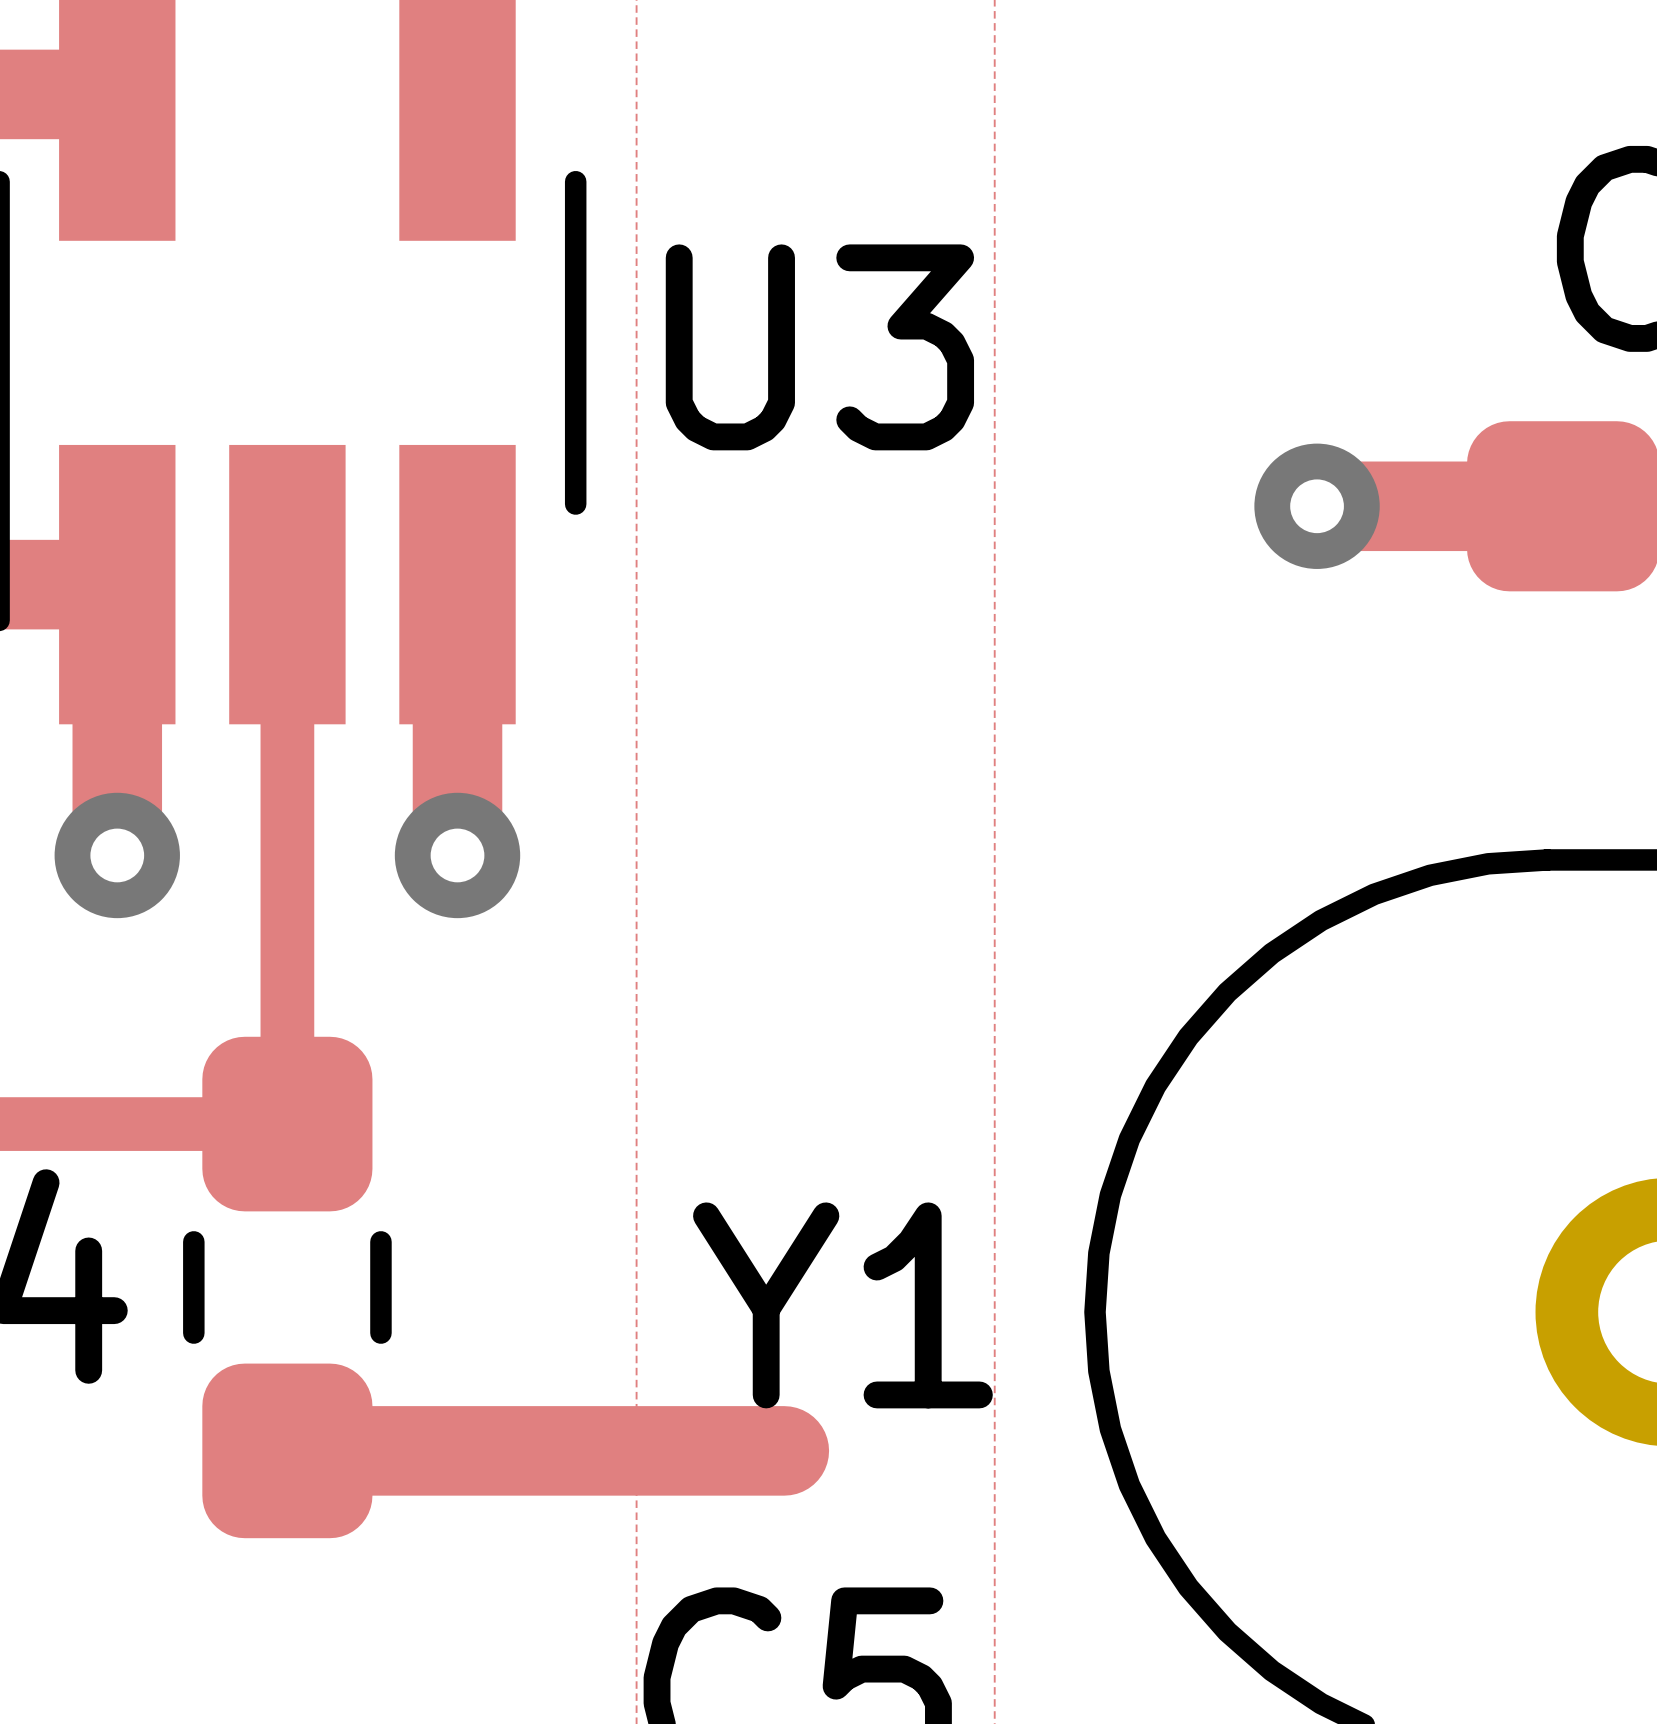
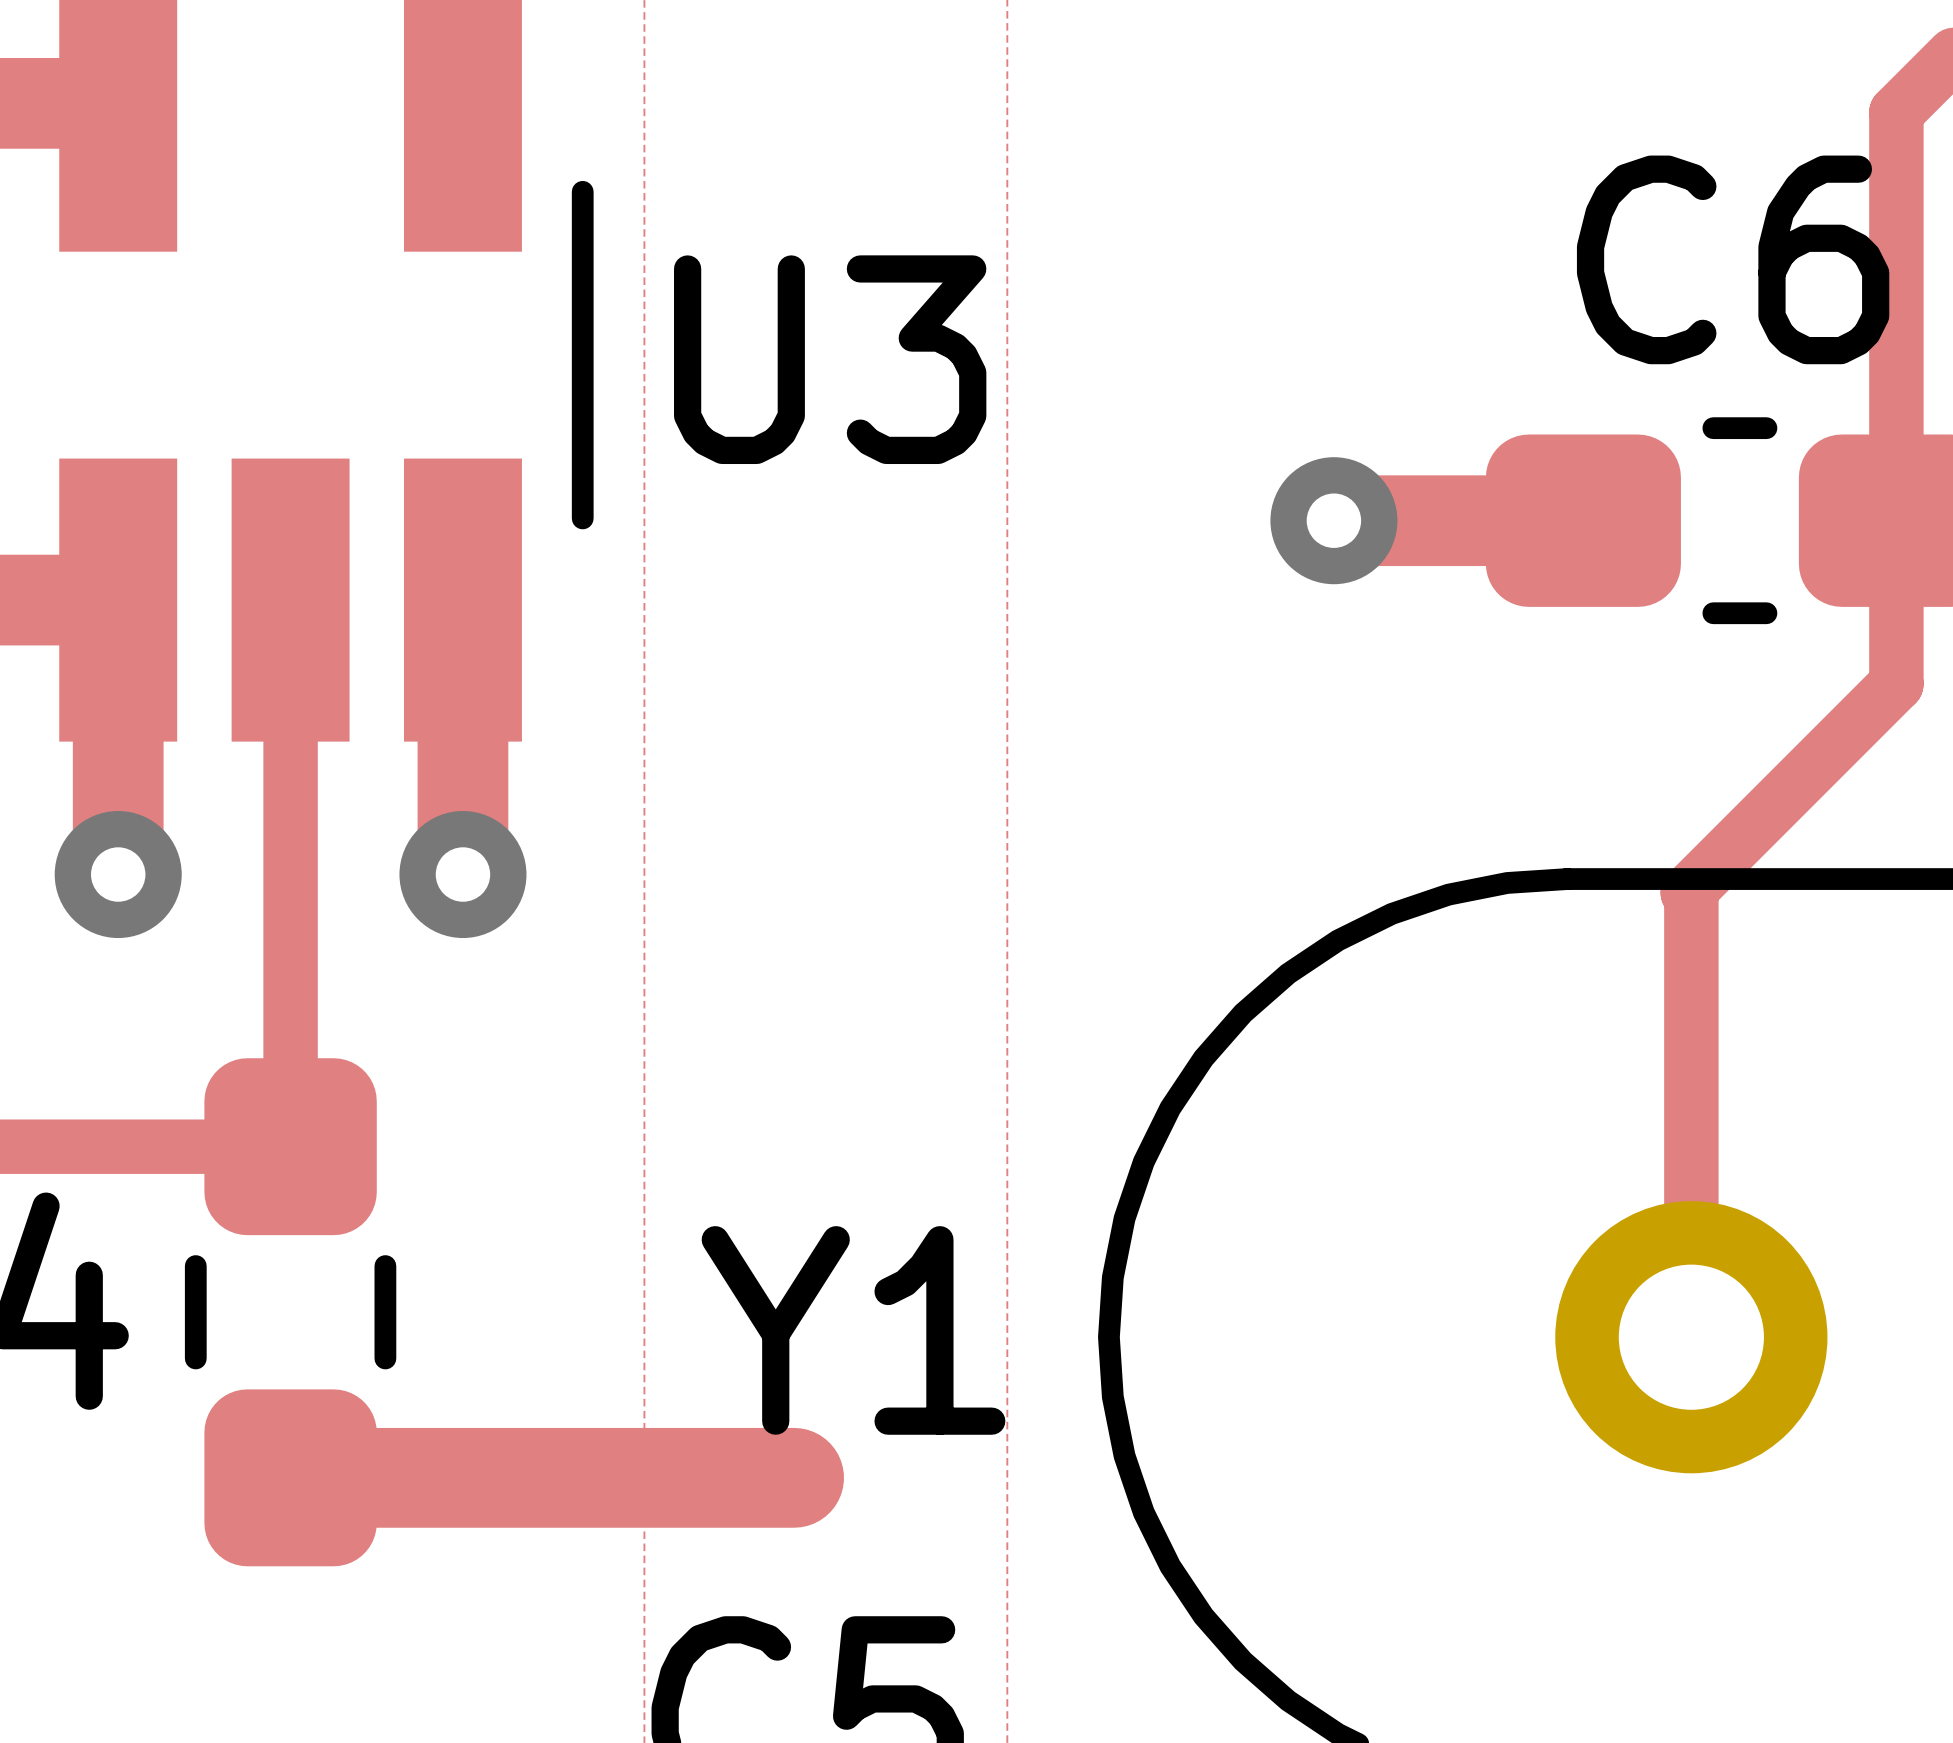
top track width: thin (287, 1450) (784, 1450) -> thick (290, 1477) (794, 1477)

